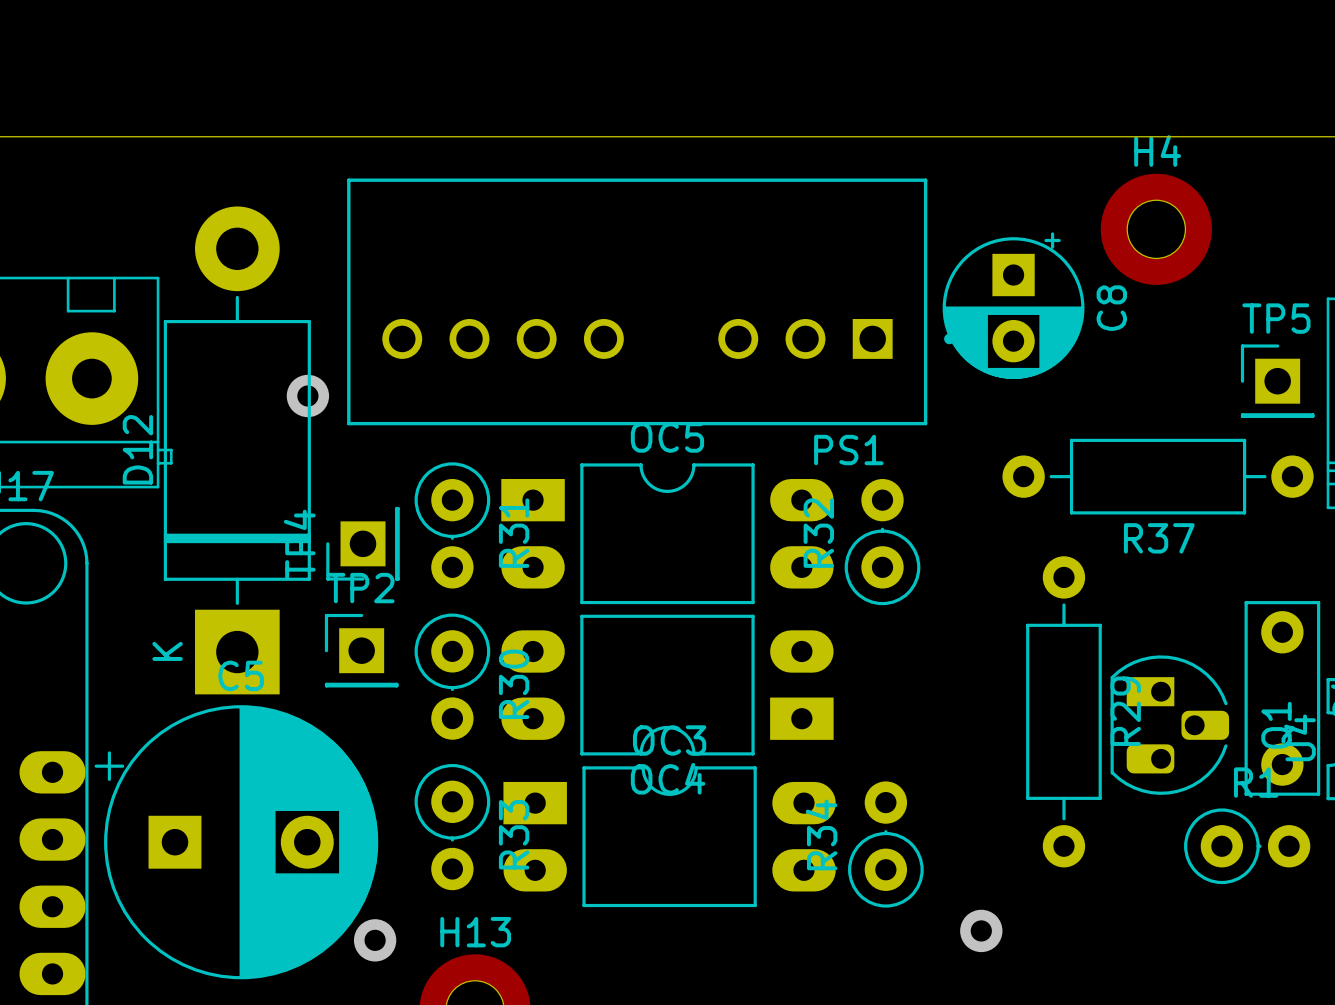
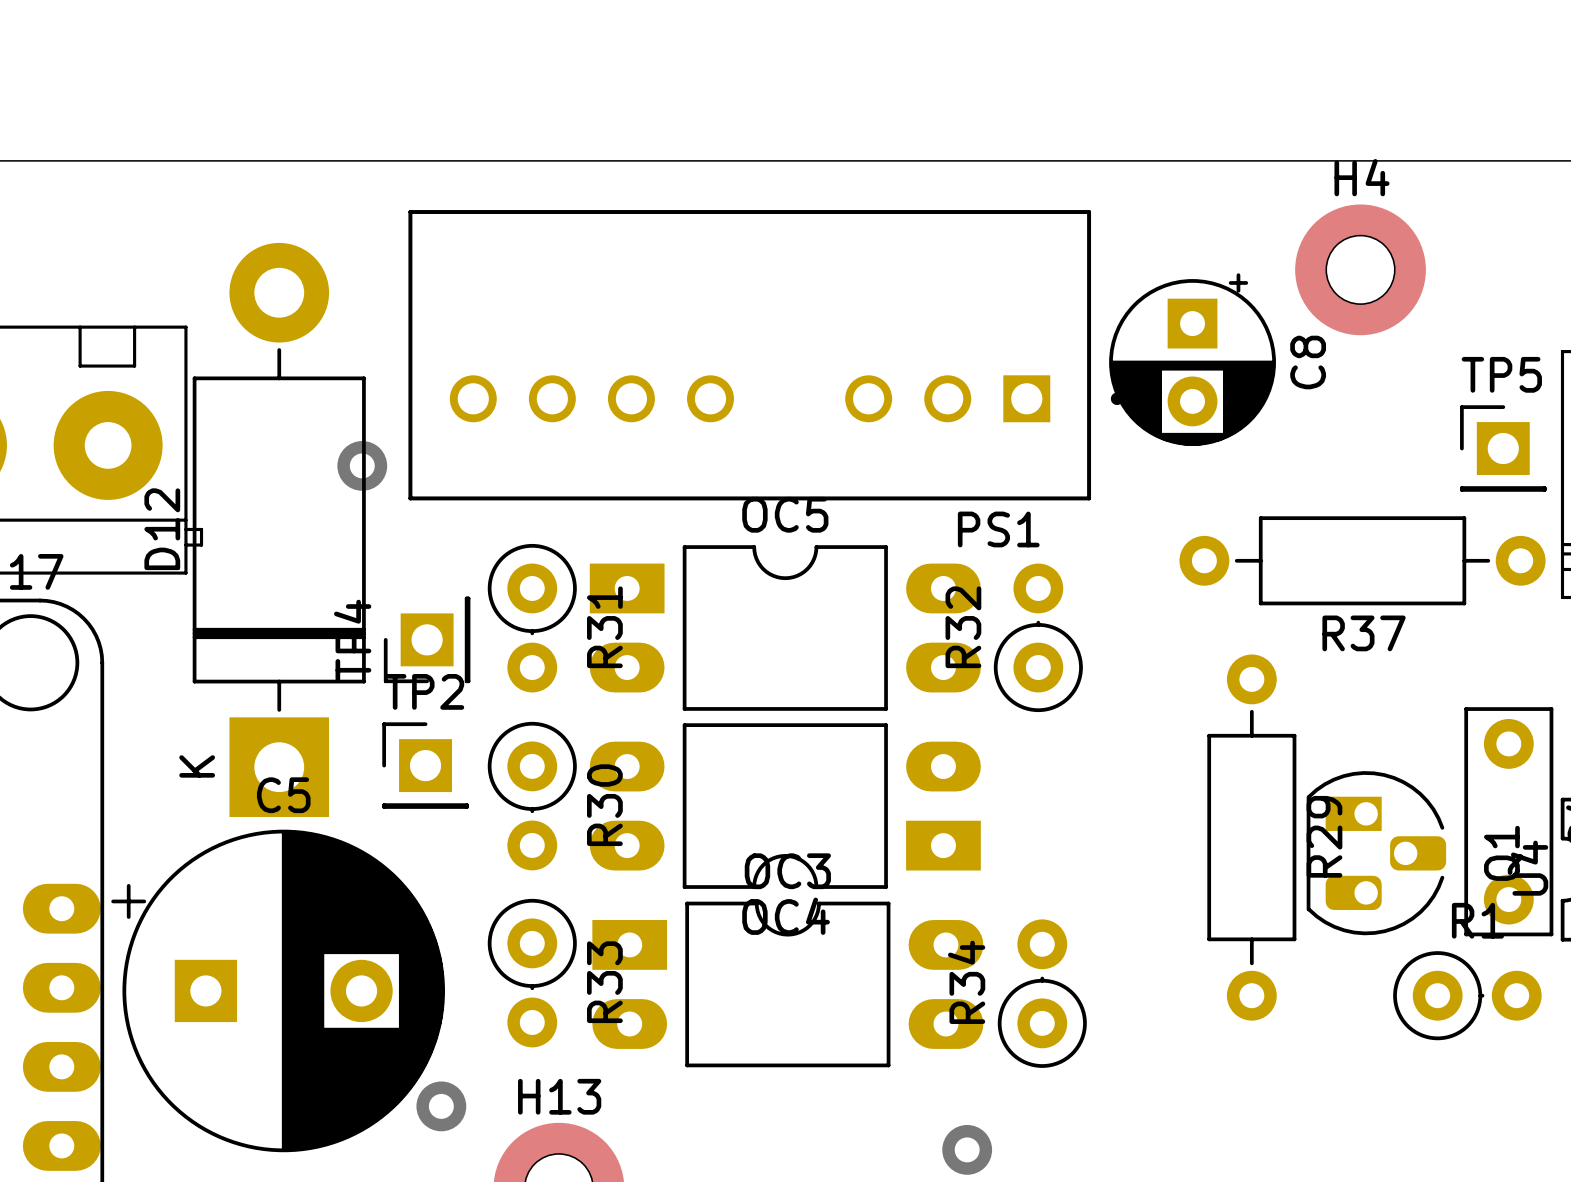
via: (981, 930) -> none
via: none -> (967, 1149)

